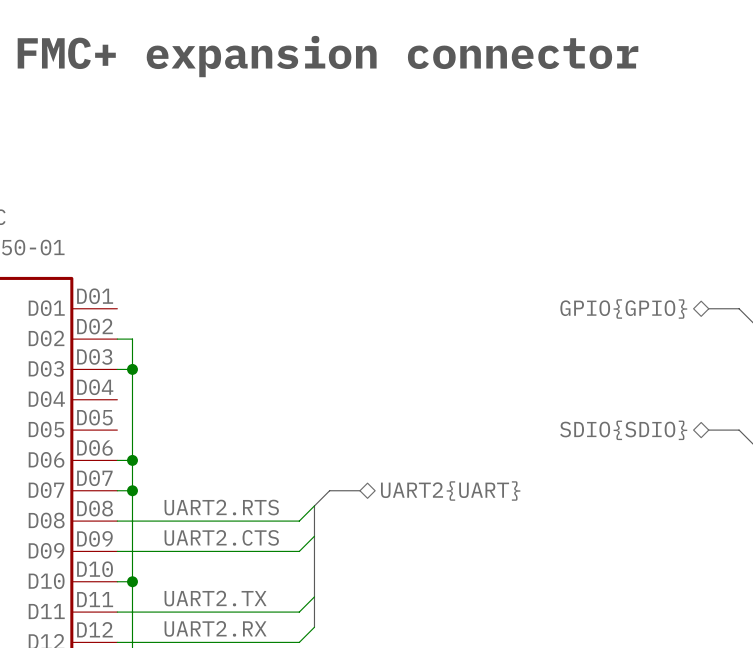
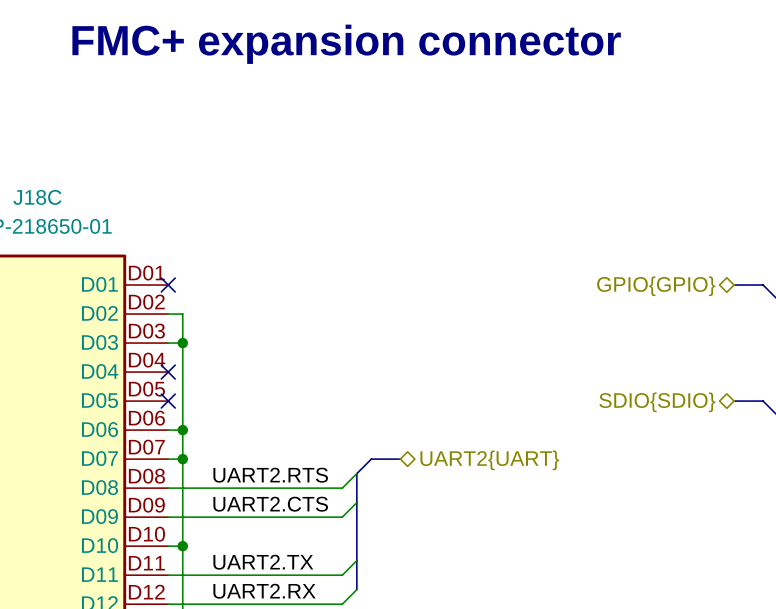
no-connect mark: none -> (168, 285)
no-connect mark: none -> (168, 372)
no-connect mark: none -> (168, 401)

